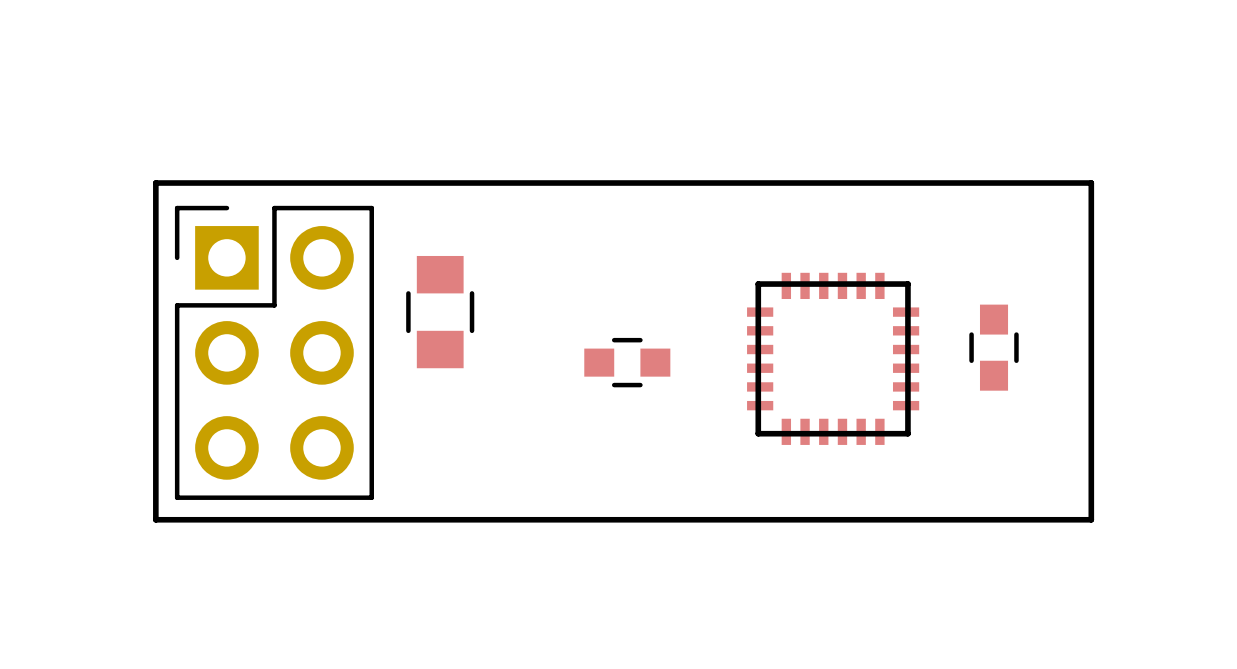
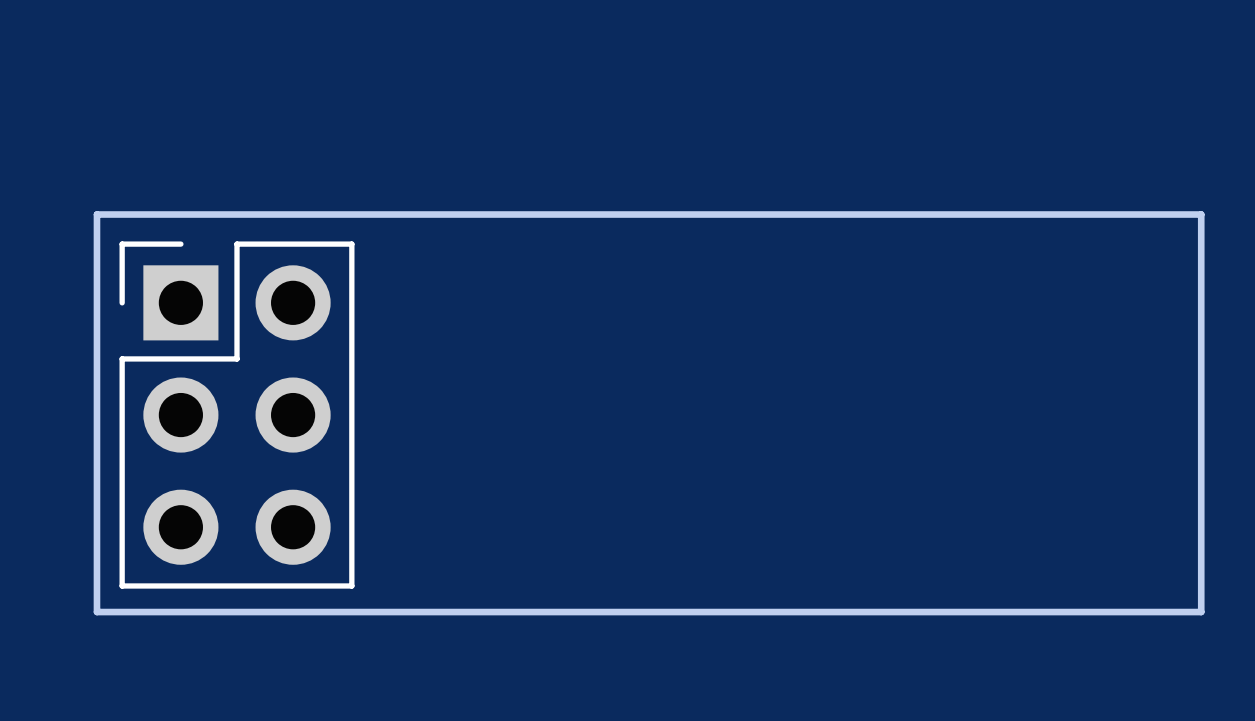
part: (440, 312) -> none
part: (994, 347) -> none
part: (833, 358) -> none
part: (627, 362) -> none

